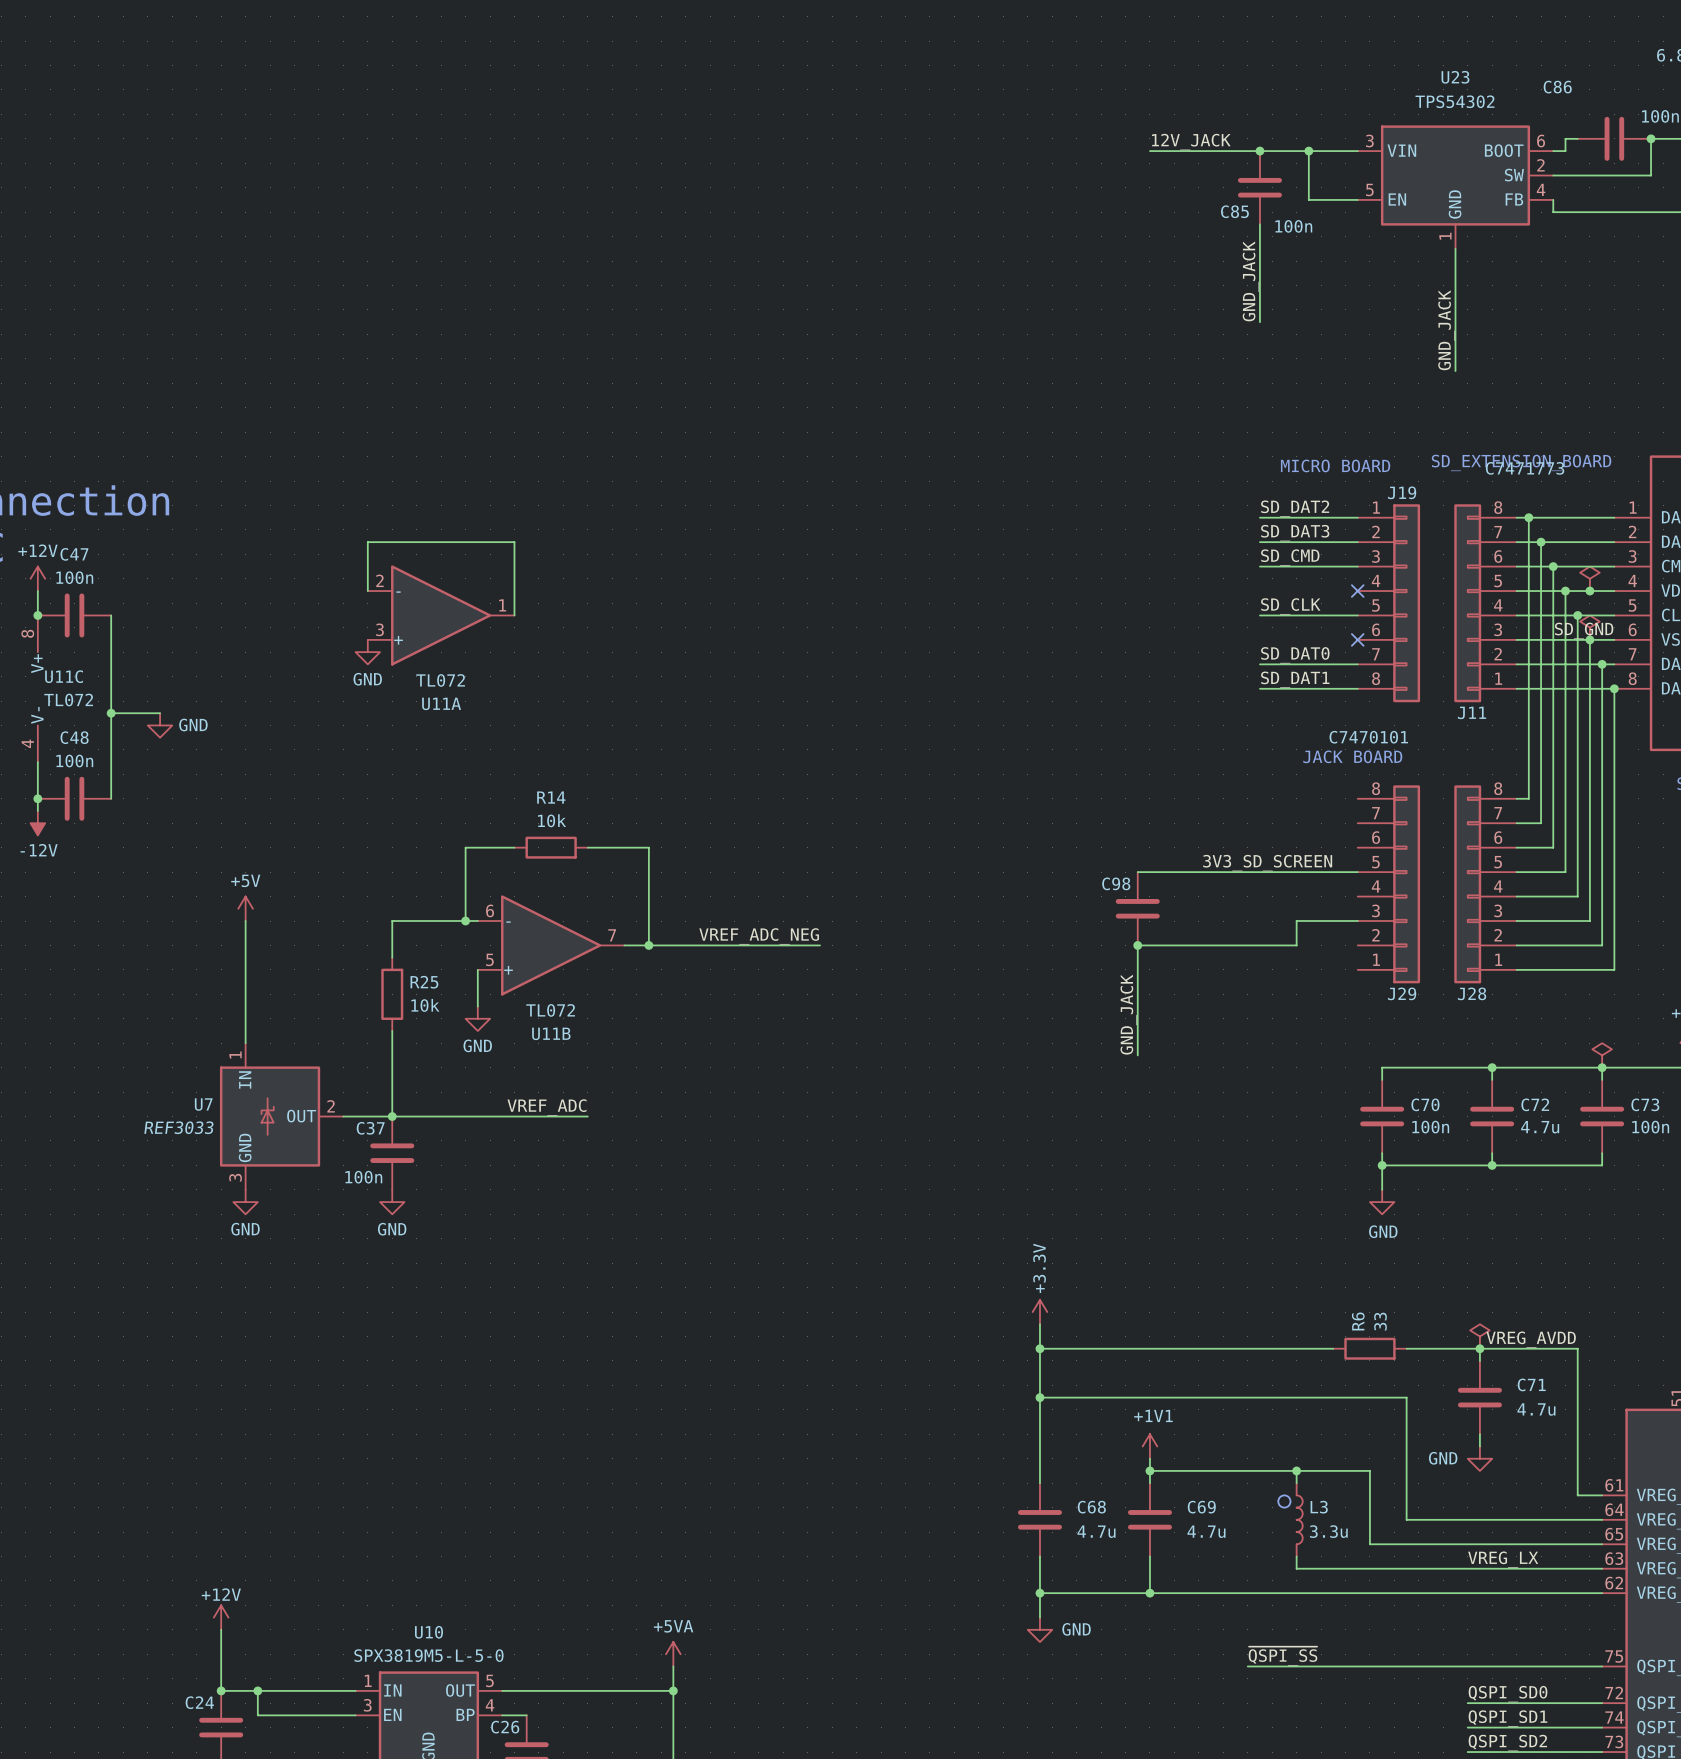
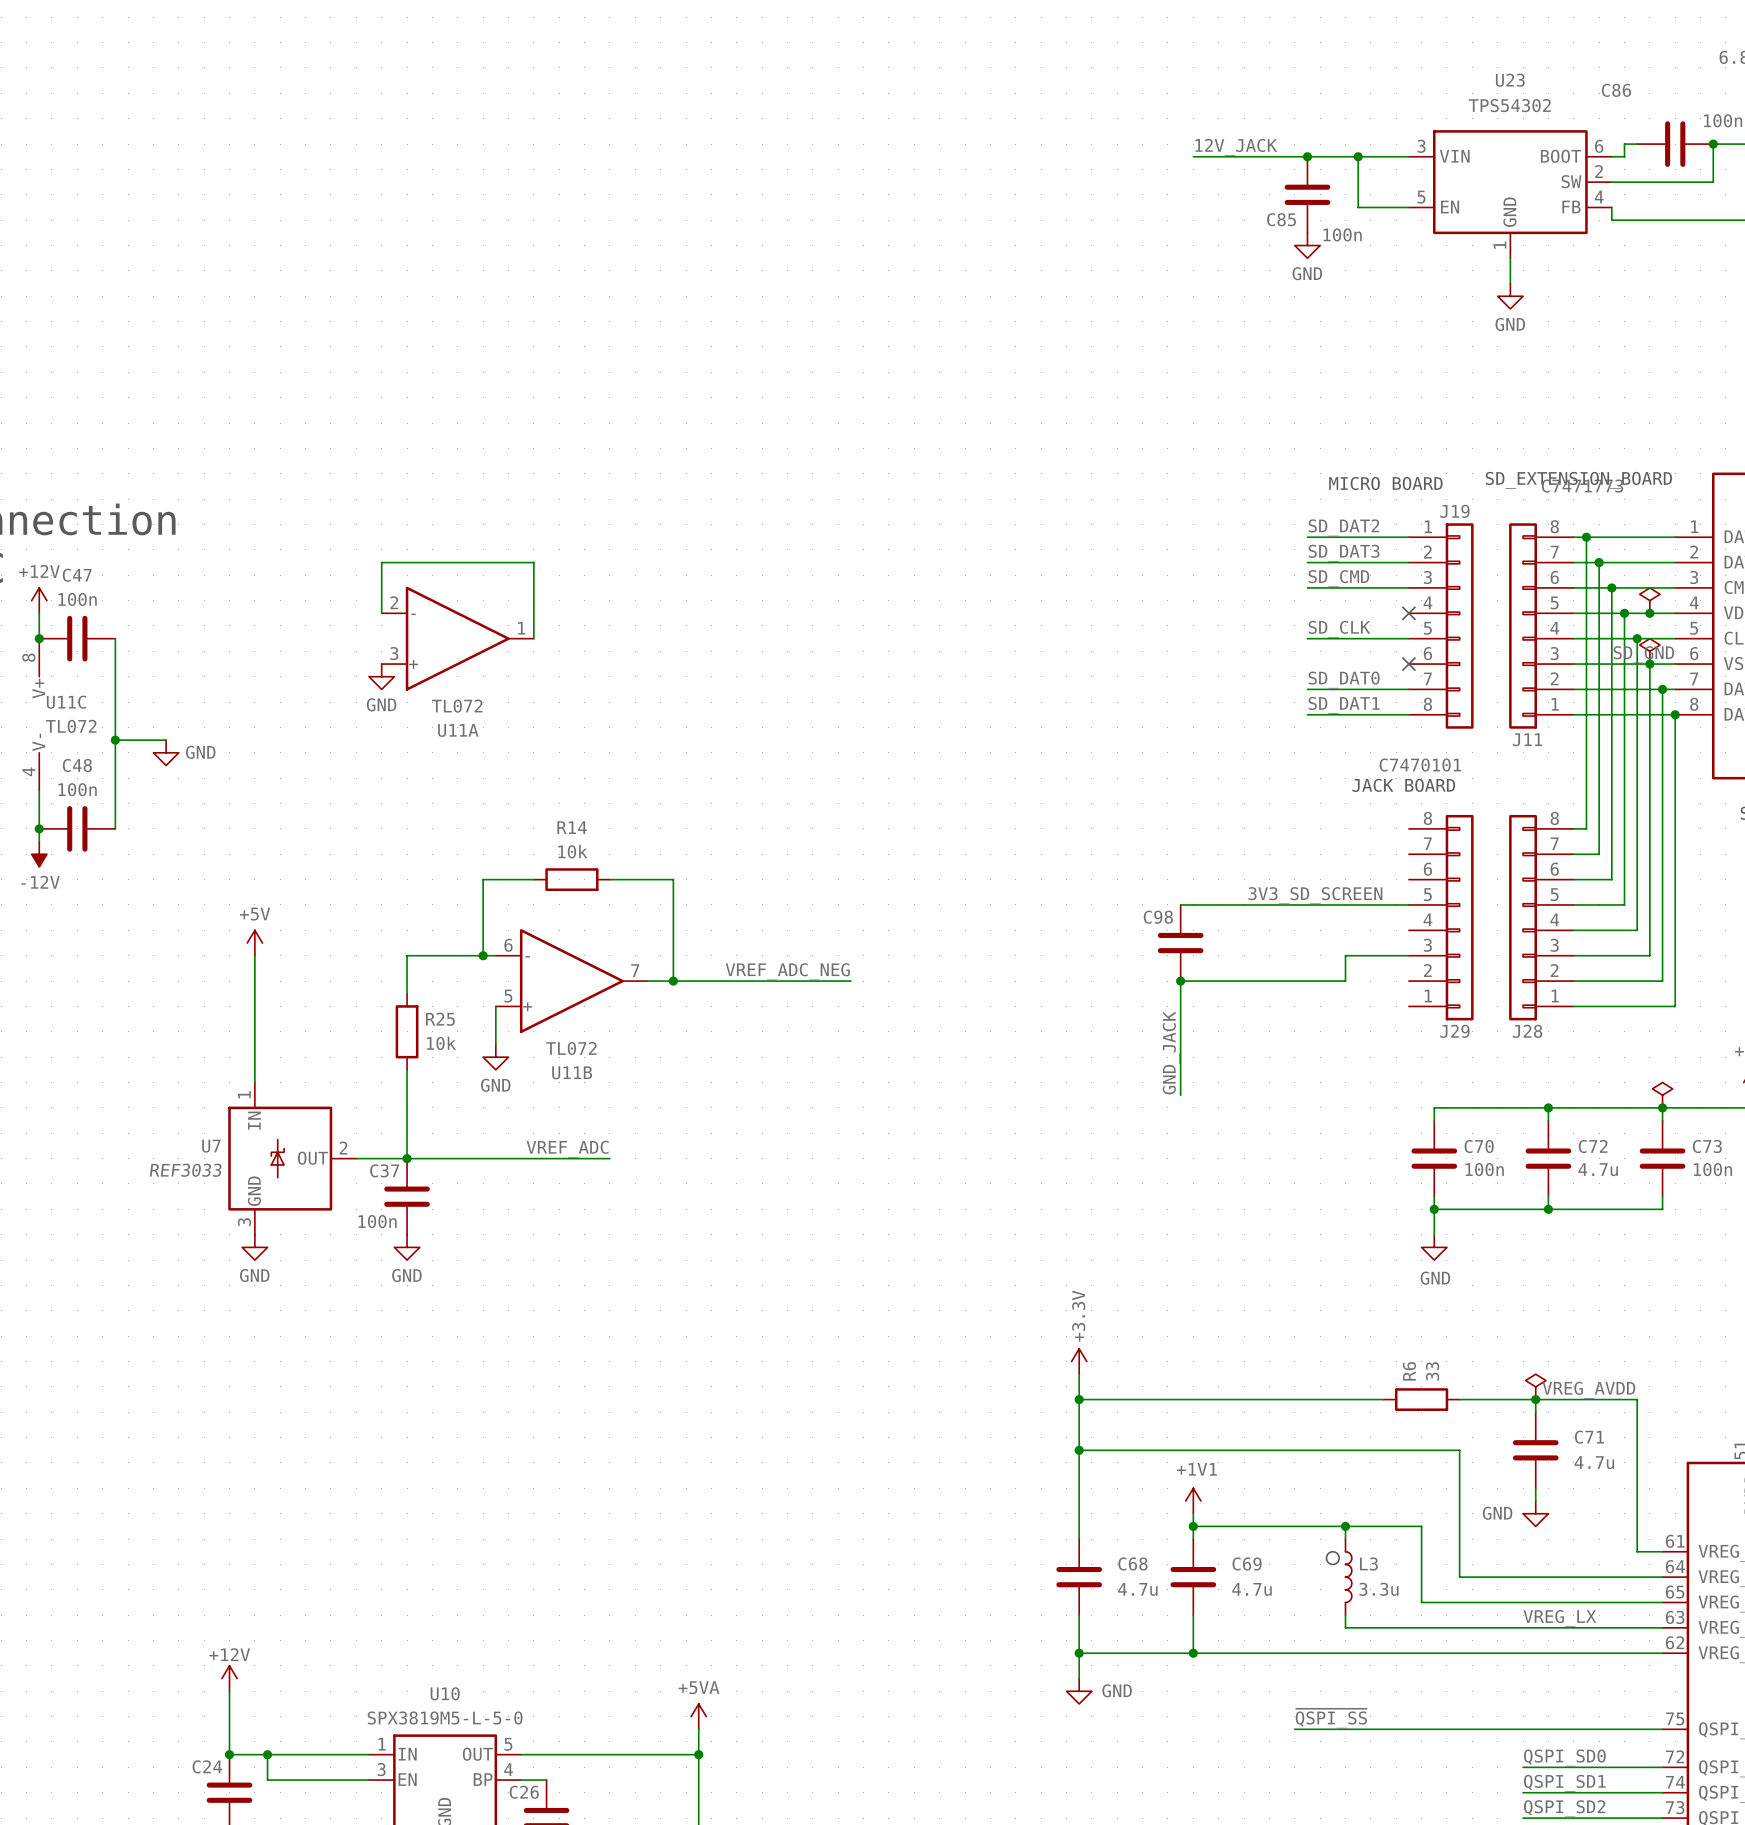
wire: (1259, 224) (1259, 322) -> none
power symbol: none -> GND (1307, 245)
wire: (1455, 273) (1455, 371) -> none
label: GND_JACK (1250, 281) -> none
power symbol: none -> GND (1510, 296)
label: GND_JACK (1446, 330) -> none

